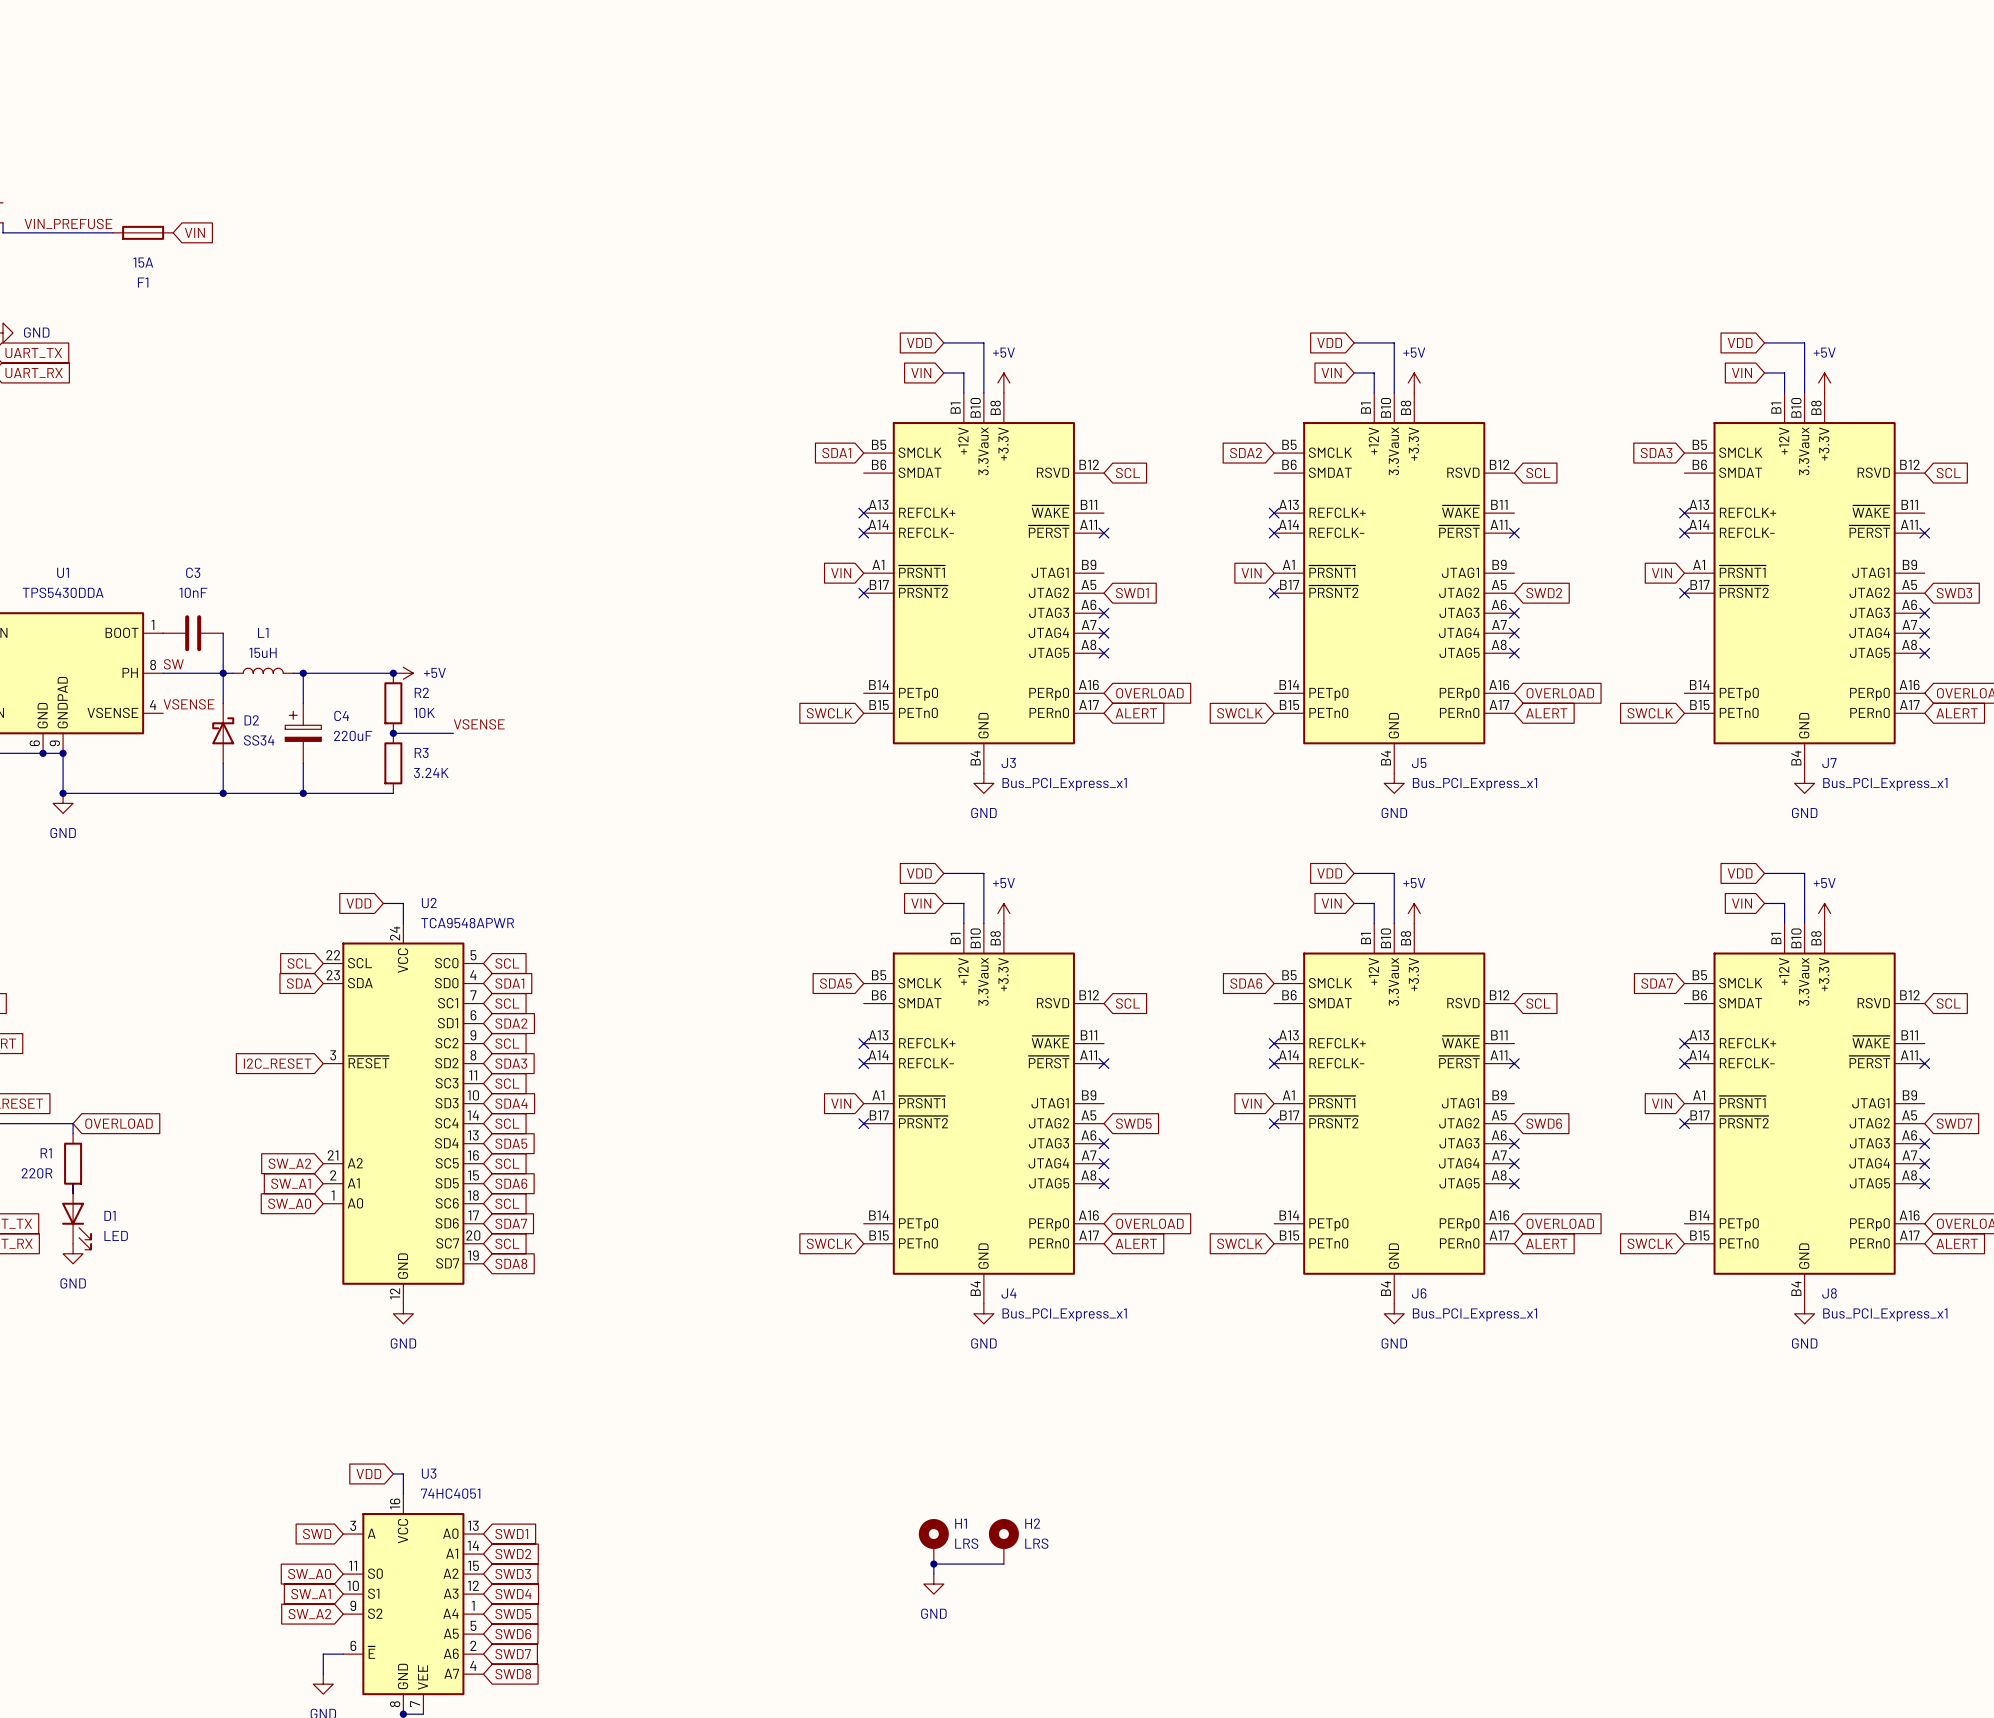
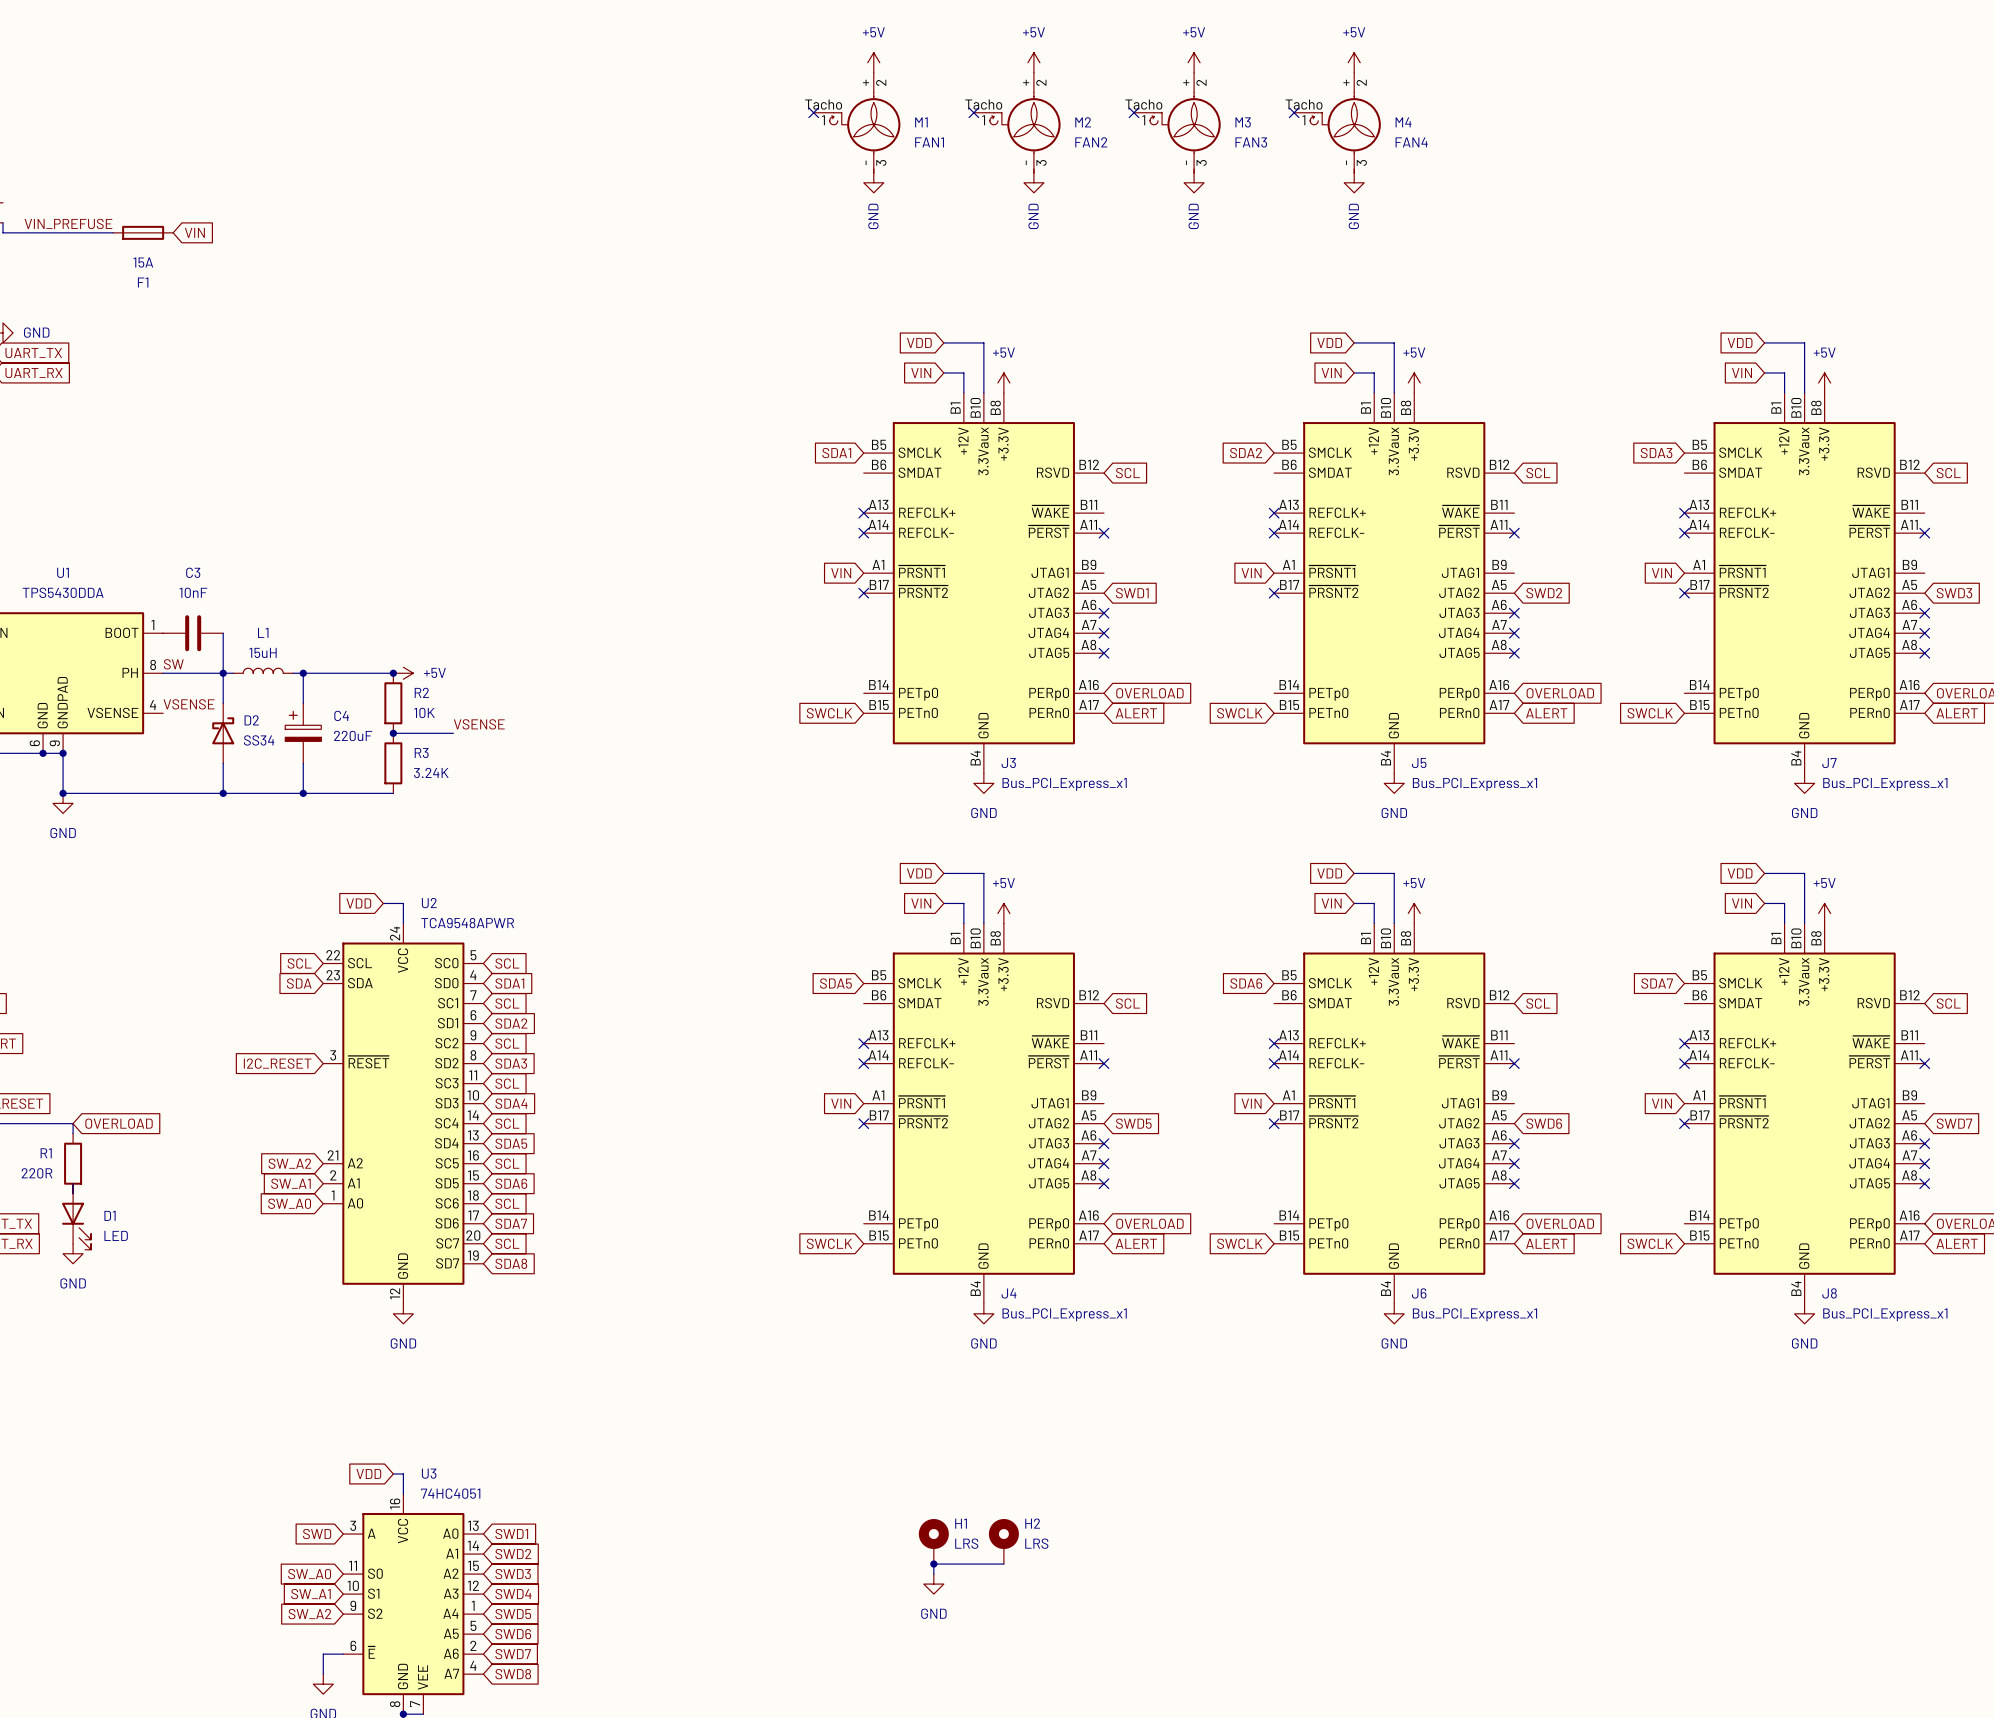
power symbol: none -> +5V (873, 62)
power symbol: none -> +5V (1033, 62)
power symbol: none -> +5V (1194, 62)
power symbol: none -> +5V (1354, 62)
no-connect mark: none -> (813, 112)
no-connect mark: none -> (973, 112)
no-connect mark: none -> (1134, 112)
no-connect mark: none -> (1294, 112)
M1: none -> FAN1 (857, 122)
M2: none -> FAN2 (1017, 122)
M3: none -> FAN3 (1177, 122)
M4: none -> FAN4 (1337, 122)
power symbol: none -> GND (873, 182)
power symbol: none -> GND (1033, 182)
power symbol: none -> GND (1194, 182)
power symbol: none -> GND (1354, 182)

